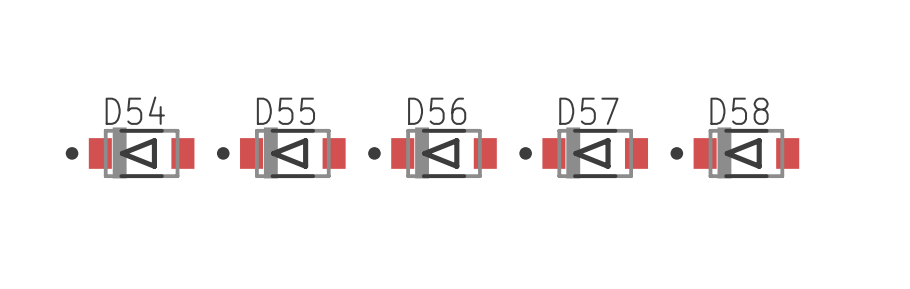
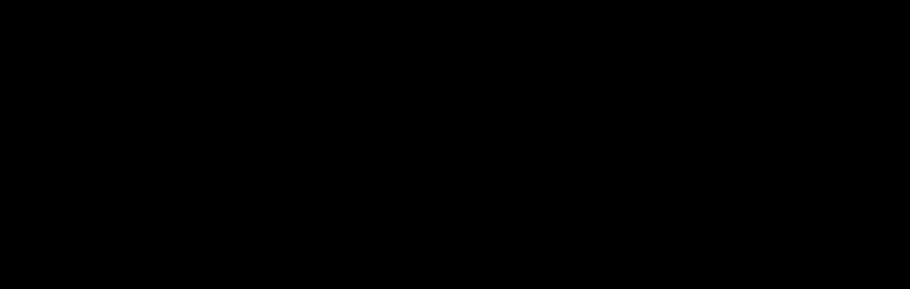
D54: (130, 152) -> none
D55: (281, 152) -> none
D56: (432, 152) -> none
D57: (583, 152) -> none
D58: (734, 152) -> none

